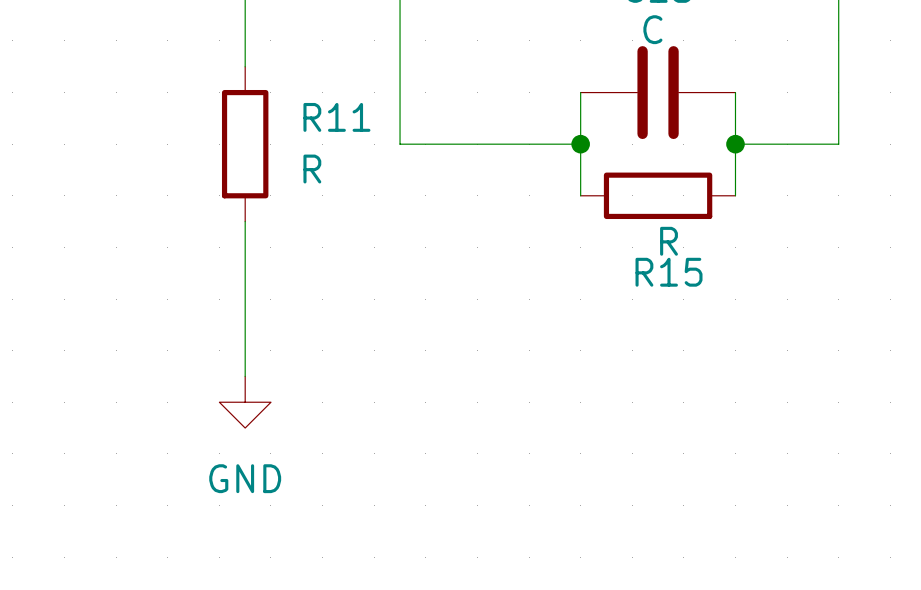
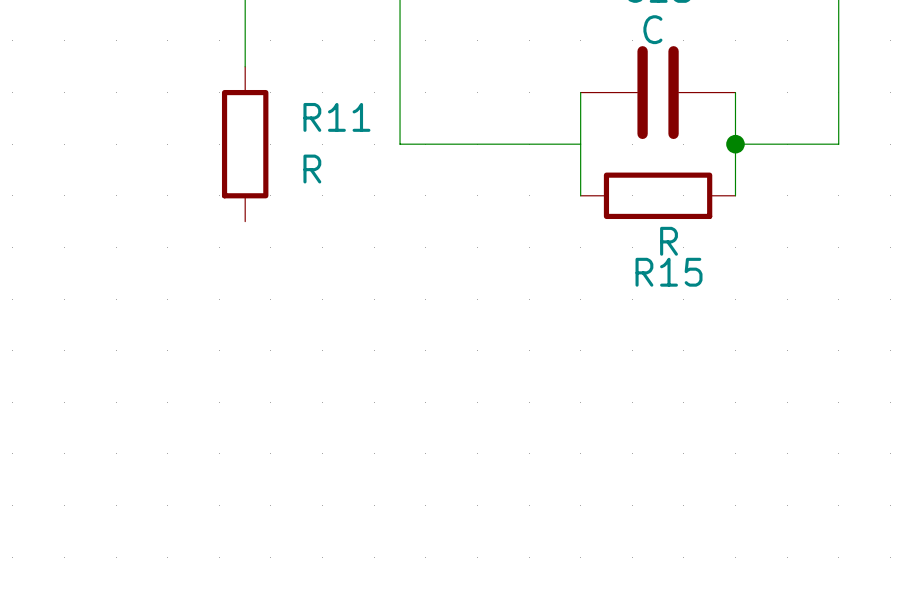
junction: (580, 144) -> none
wire: (245, 221) (245, 376) -> none
power symbol: GND (245, 402) -> none

